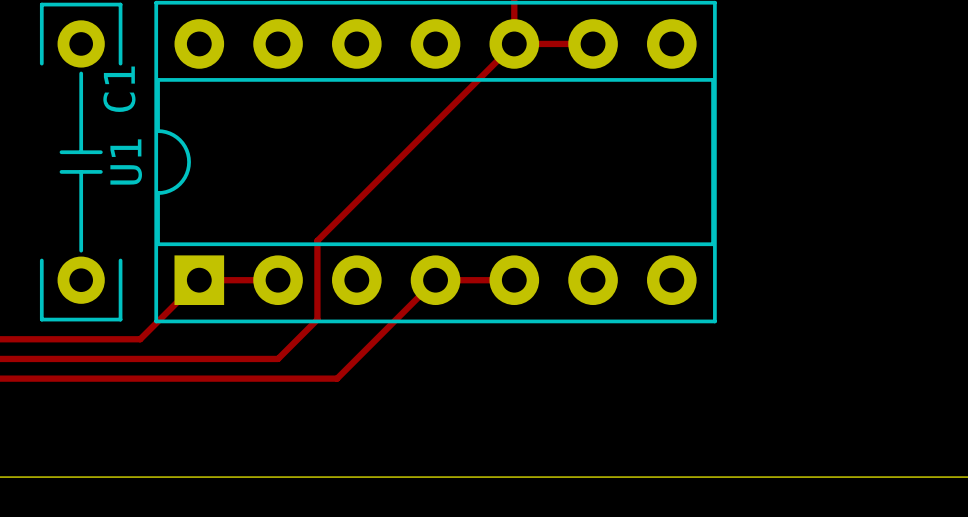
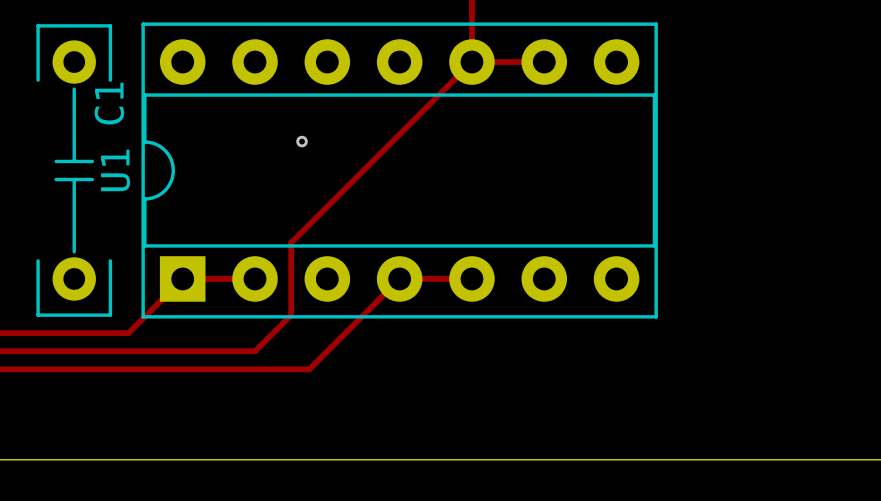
via: none -> (302, 141)

